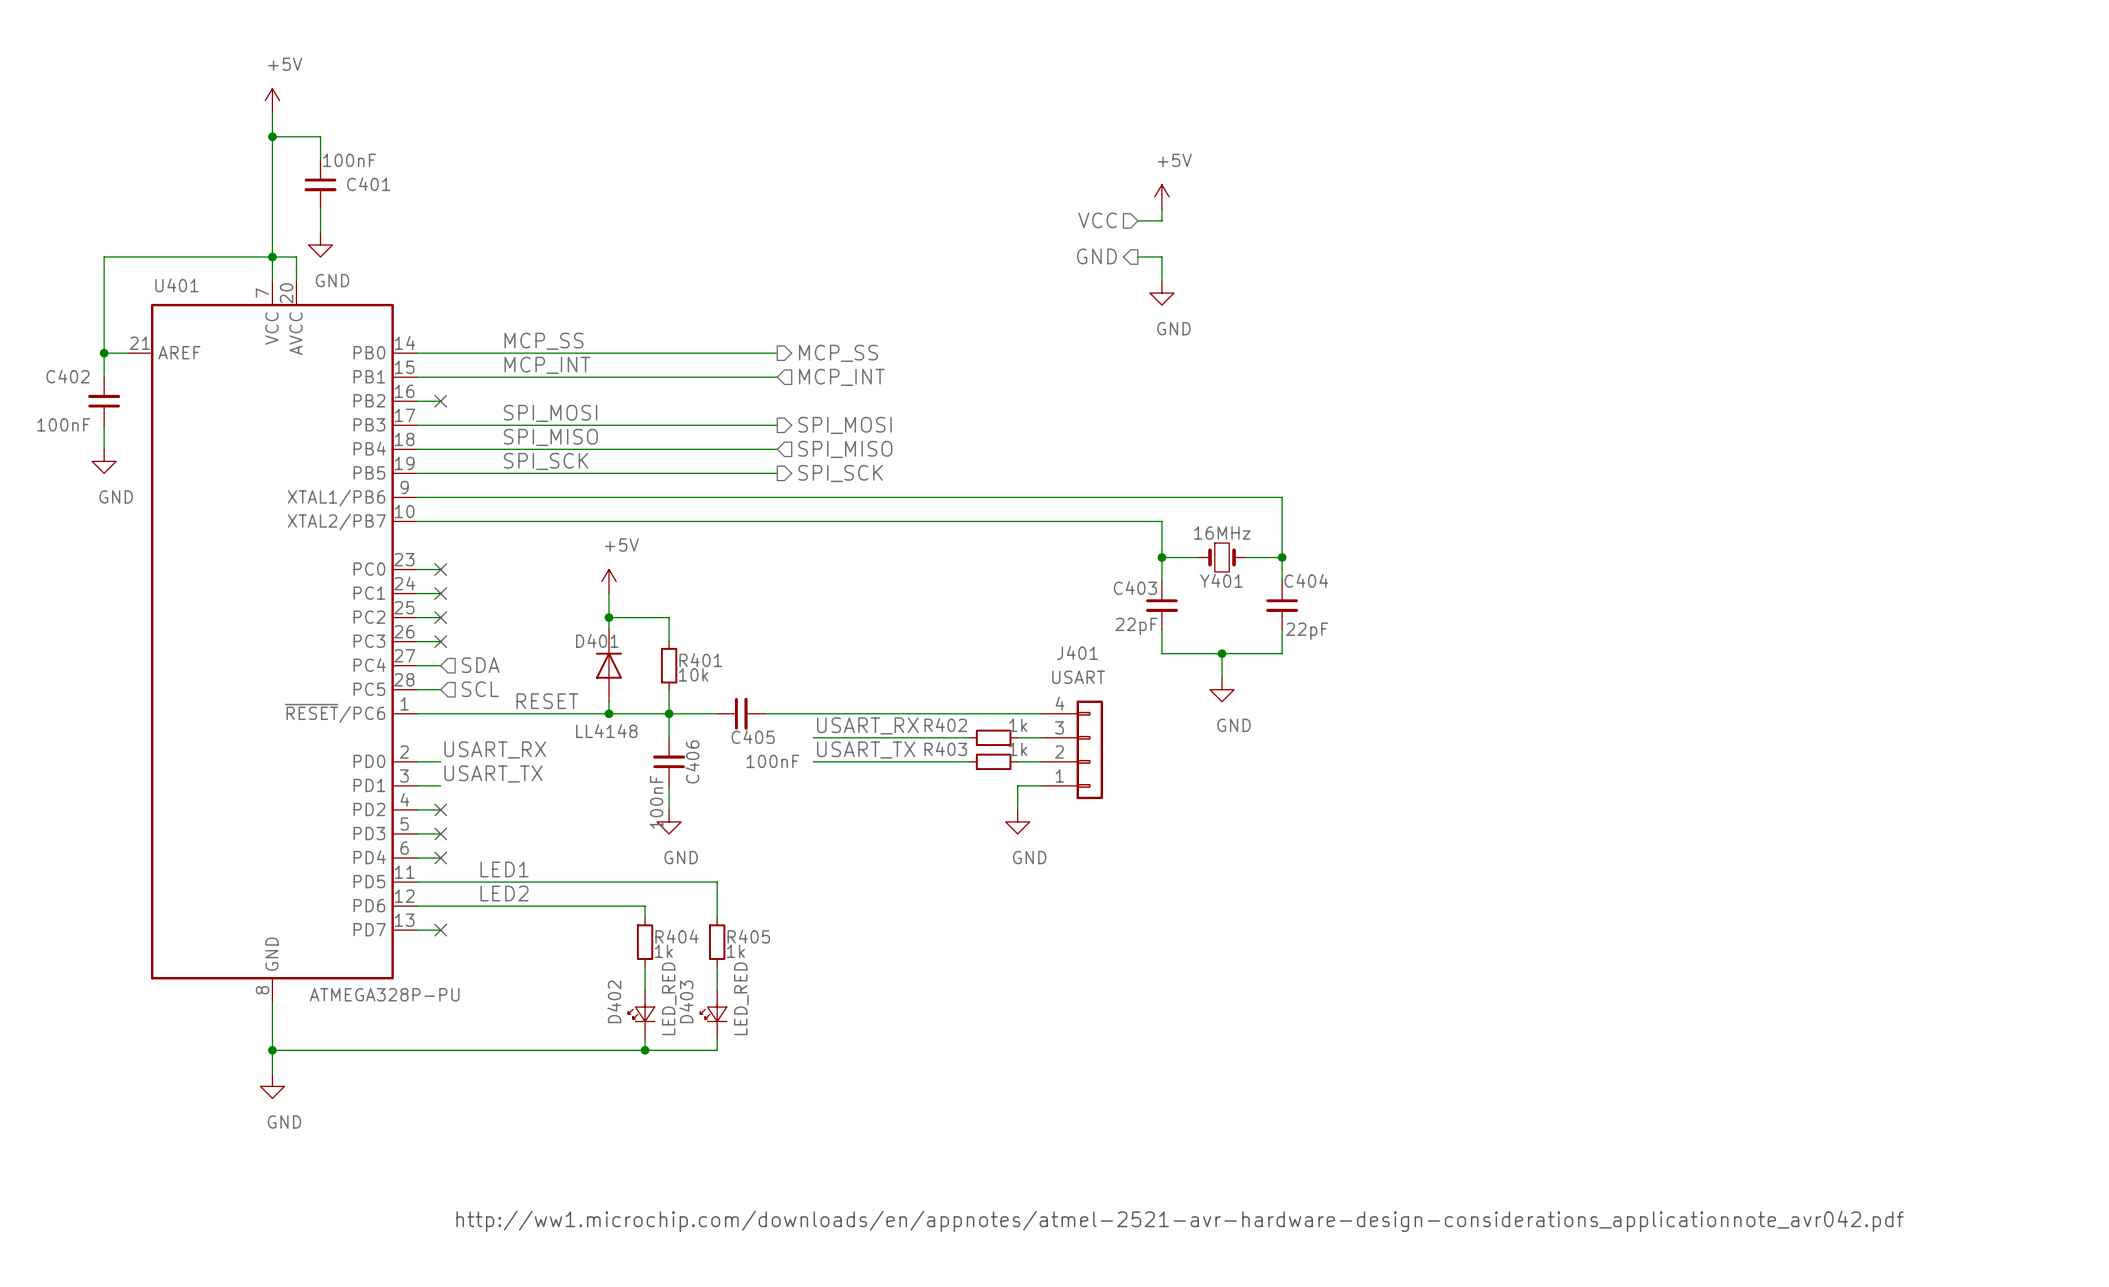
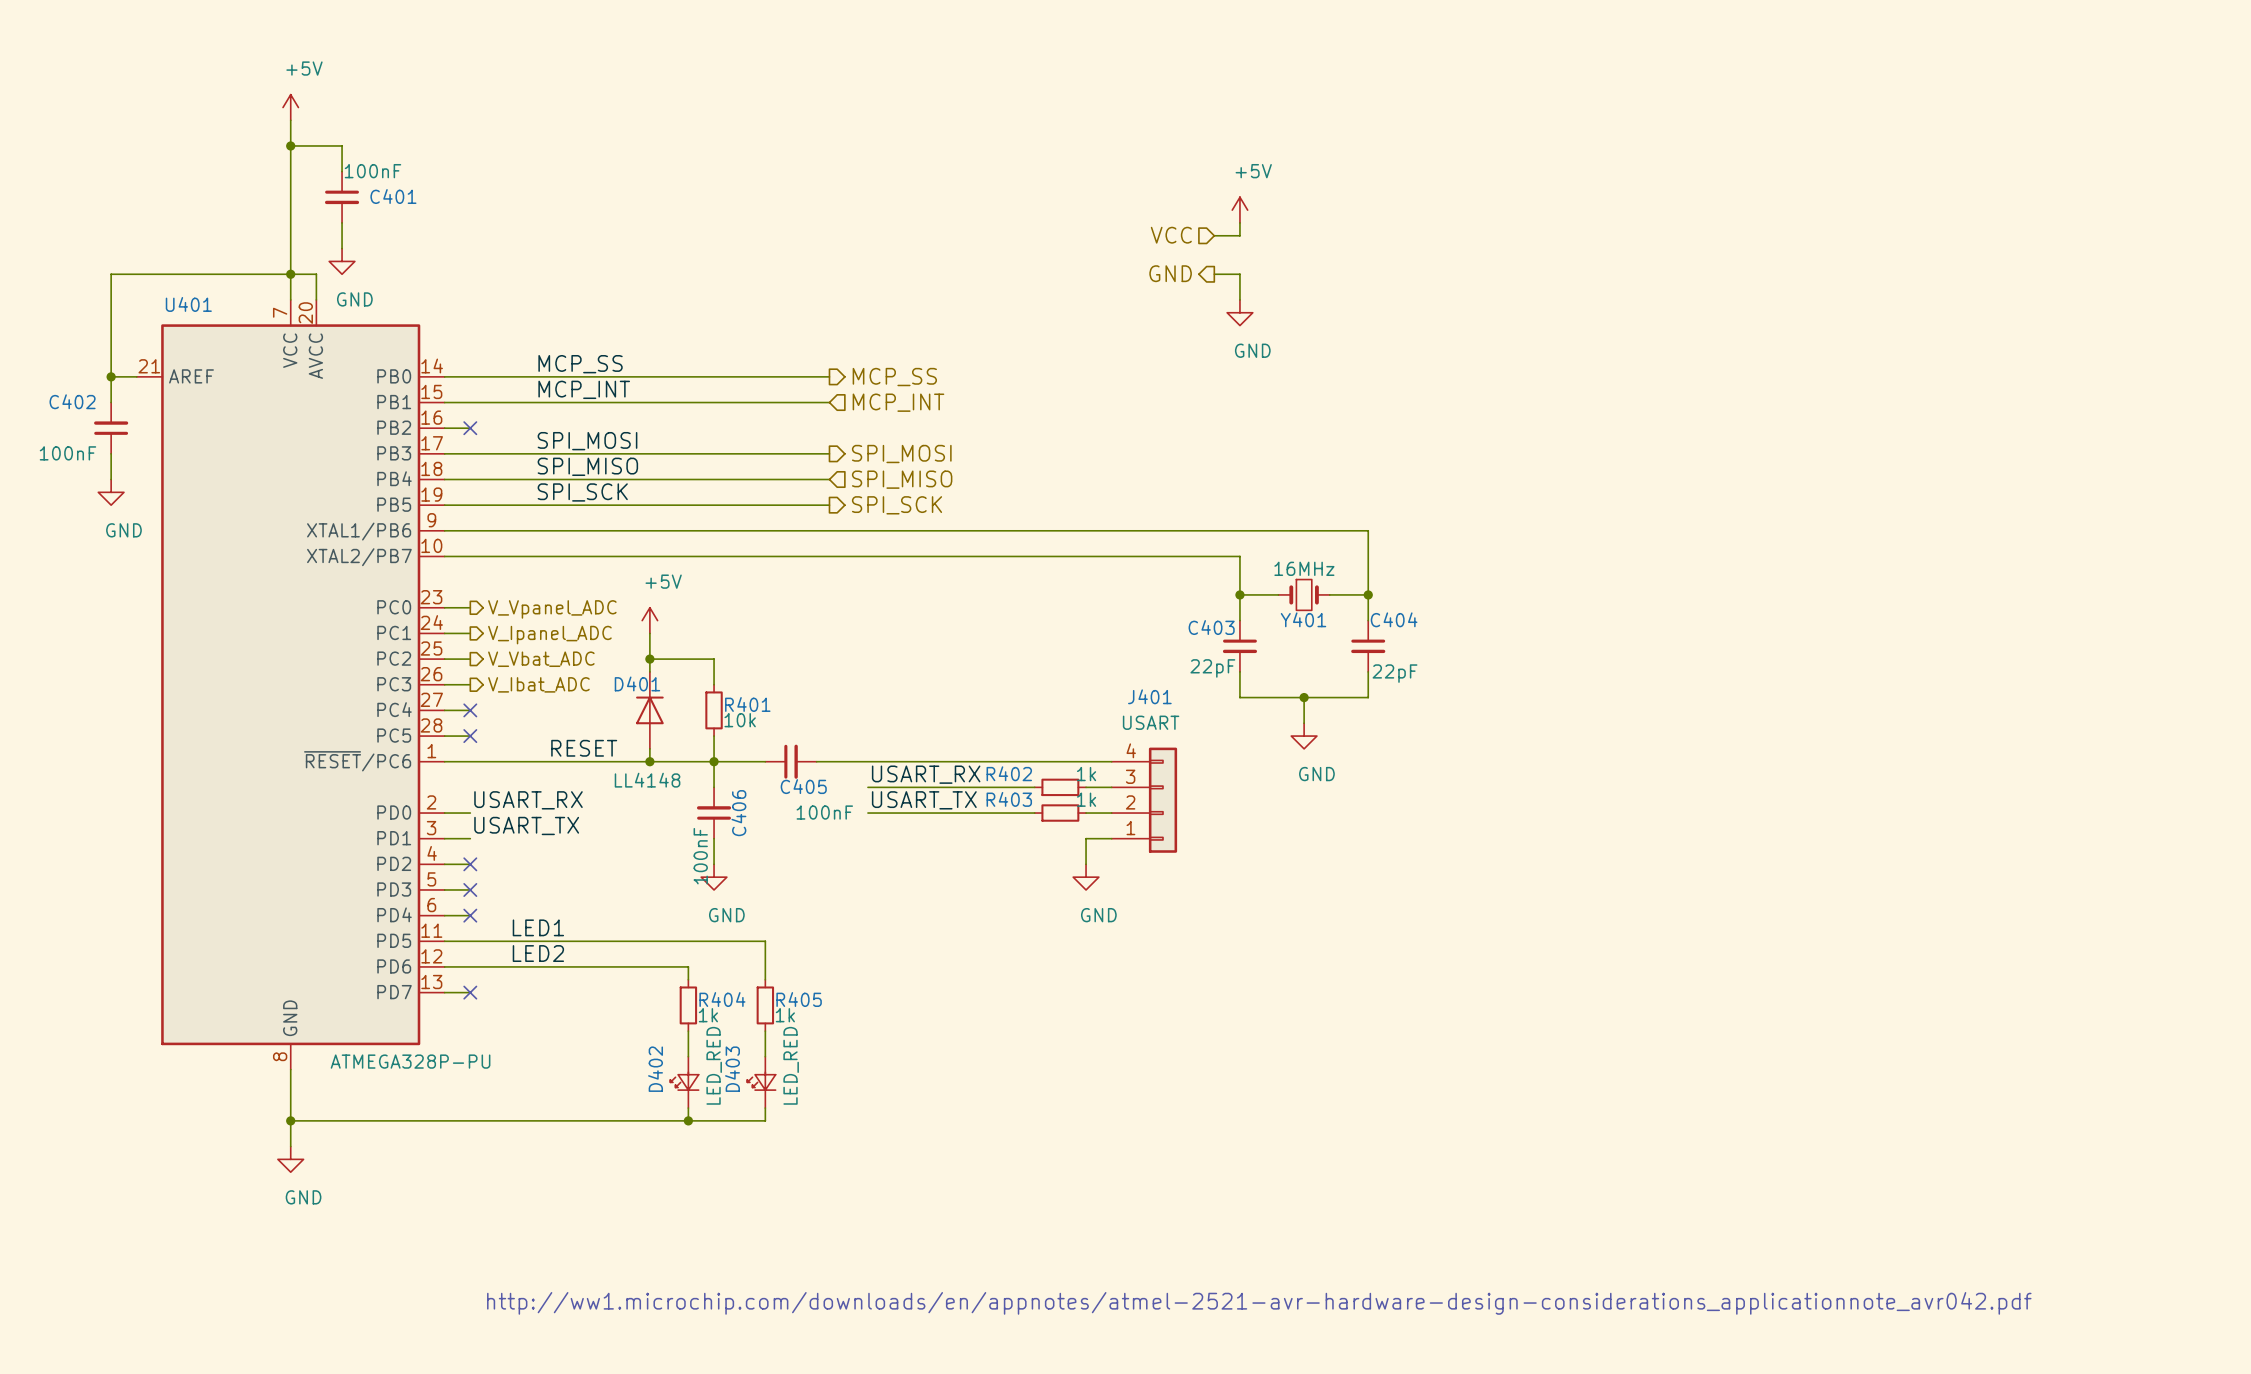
no-connect mark: (440, 569) -> none
hierarchical label: none -> V_Vpanel_ADC (552, 609)
no-connect mark: (440, 593) -> none
hierarchical label: none -> V_Ipanel_ADC (549, 635)
no-connect mark: (440, 617) -> none
hierarchical label: none -> V_Vbat_ADC (541, 659)
no-connect mark: (440, 641) -> none
hierarchical label: none -> V_Ibat_ADC (538, 684)
no-connect mark: none -> (470, 710)
hierarchical label: SDA (480, 665) -> none
no-connect mark: none -> (470, 736)
hierarchical label: SCL (480, 689) -> none

